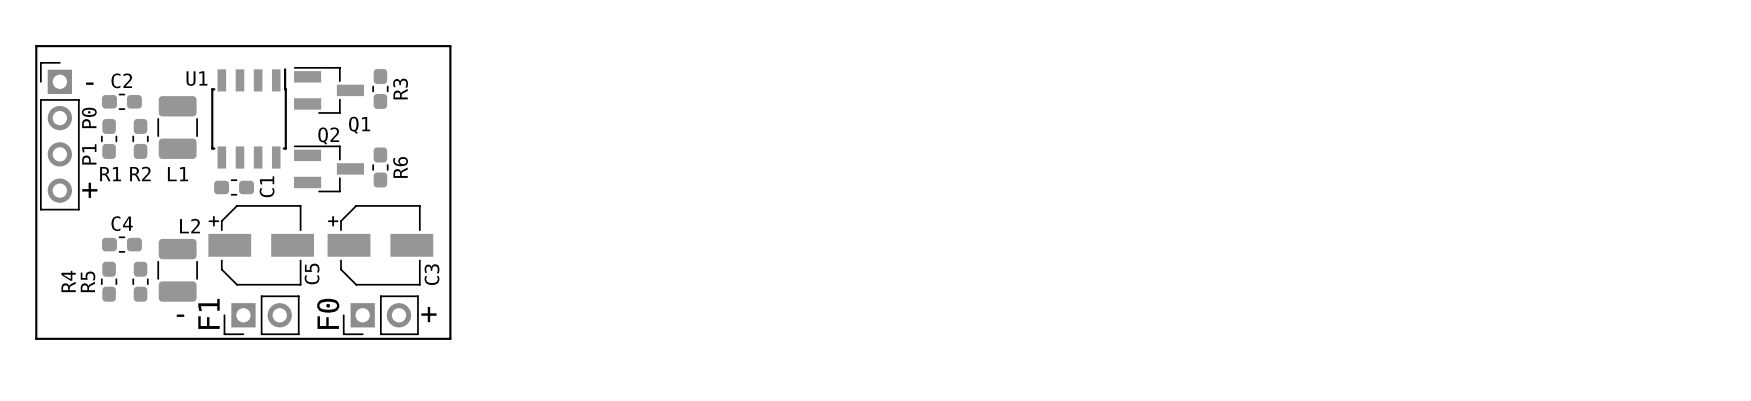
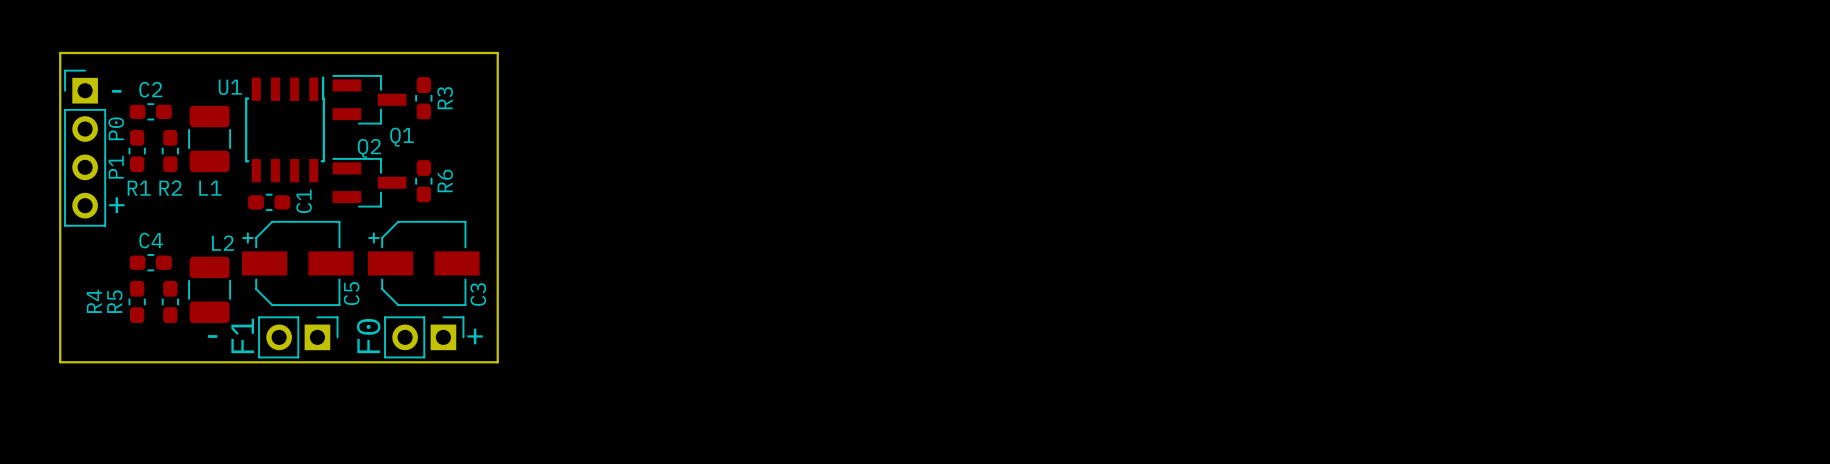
part rotation: 0° (261, 315) -> 180° (298, 337)
part rotation: 0° (380, 315) -> 180° (424, 337)

